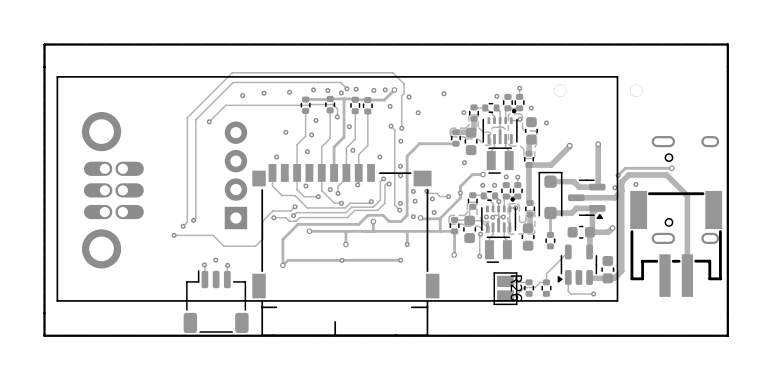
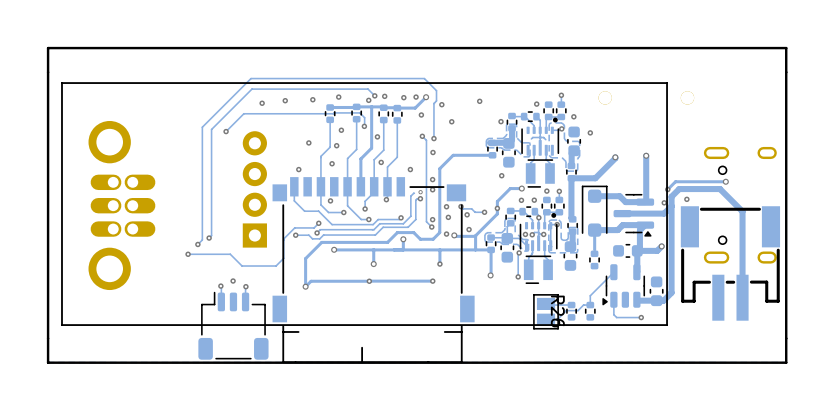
via: (327, 90) -> none
via: none -> (420, 192)
via: (383, 178) -> none
via: (330, 189) -> none

